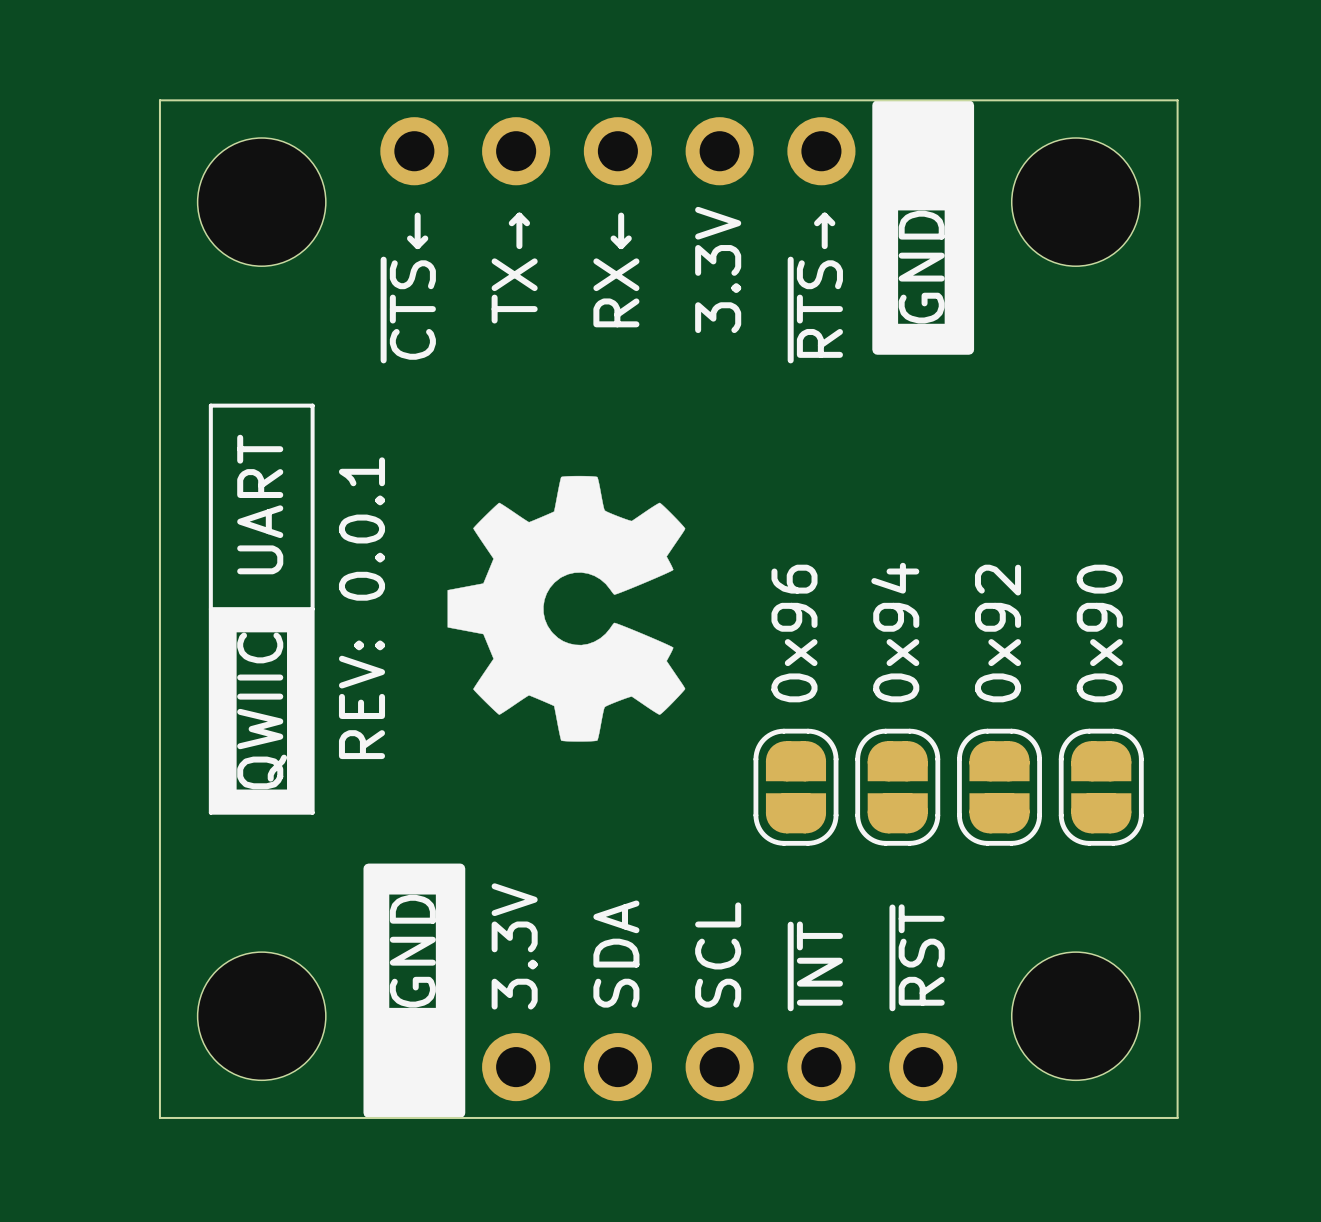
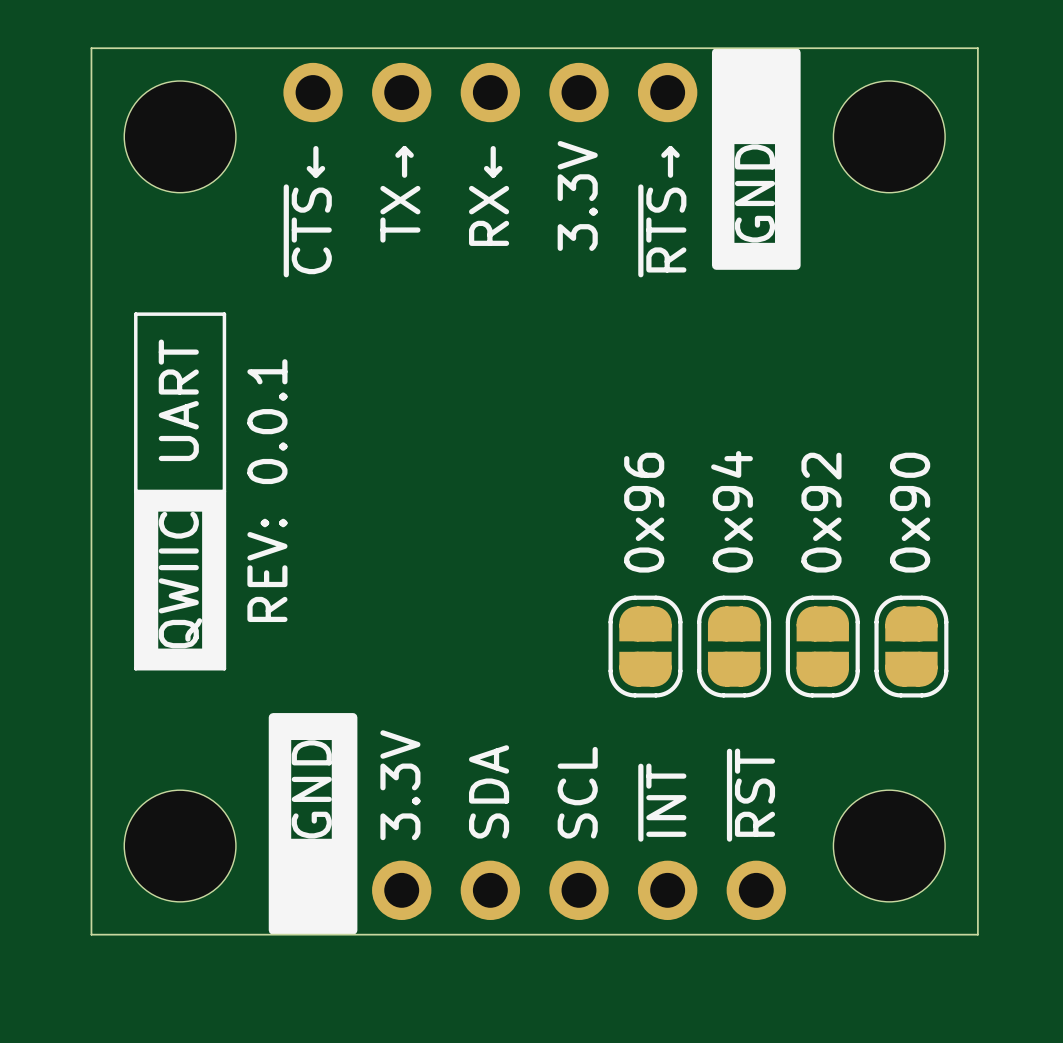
drawing: [447, 475, 686, 742] -> none

